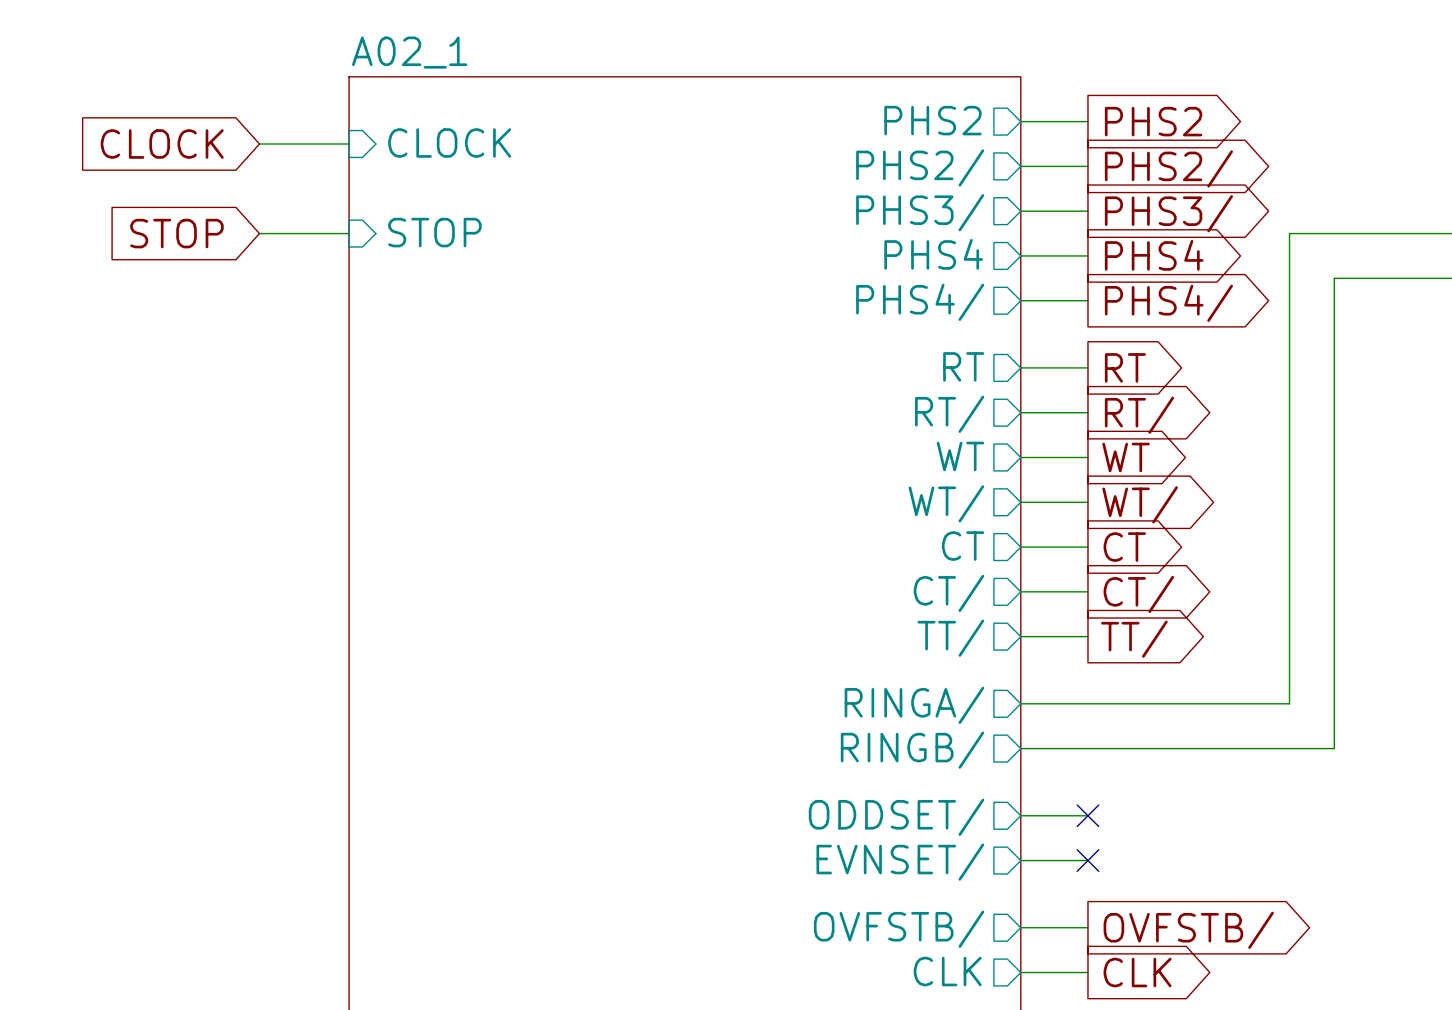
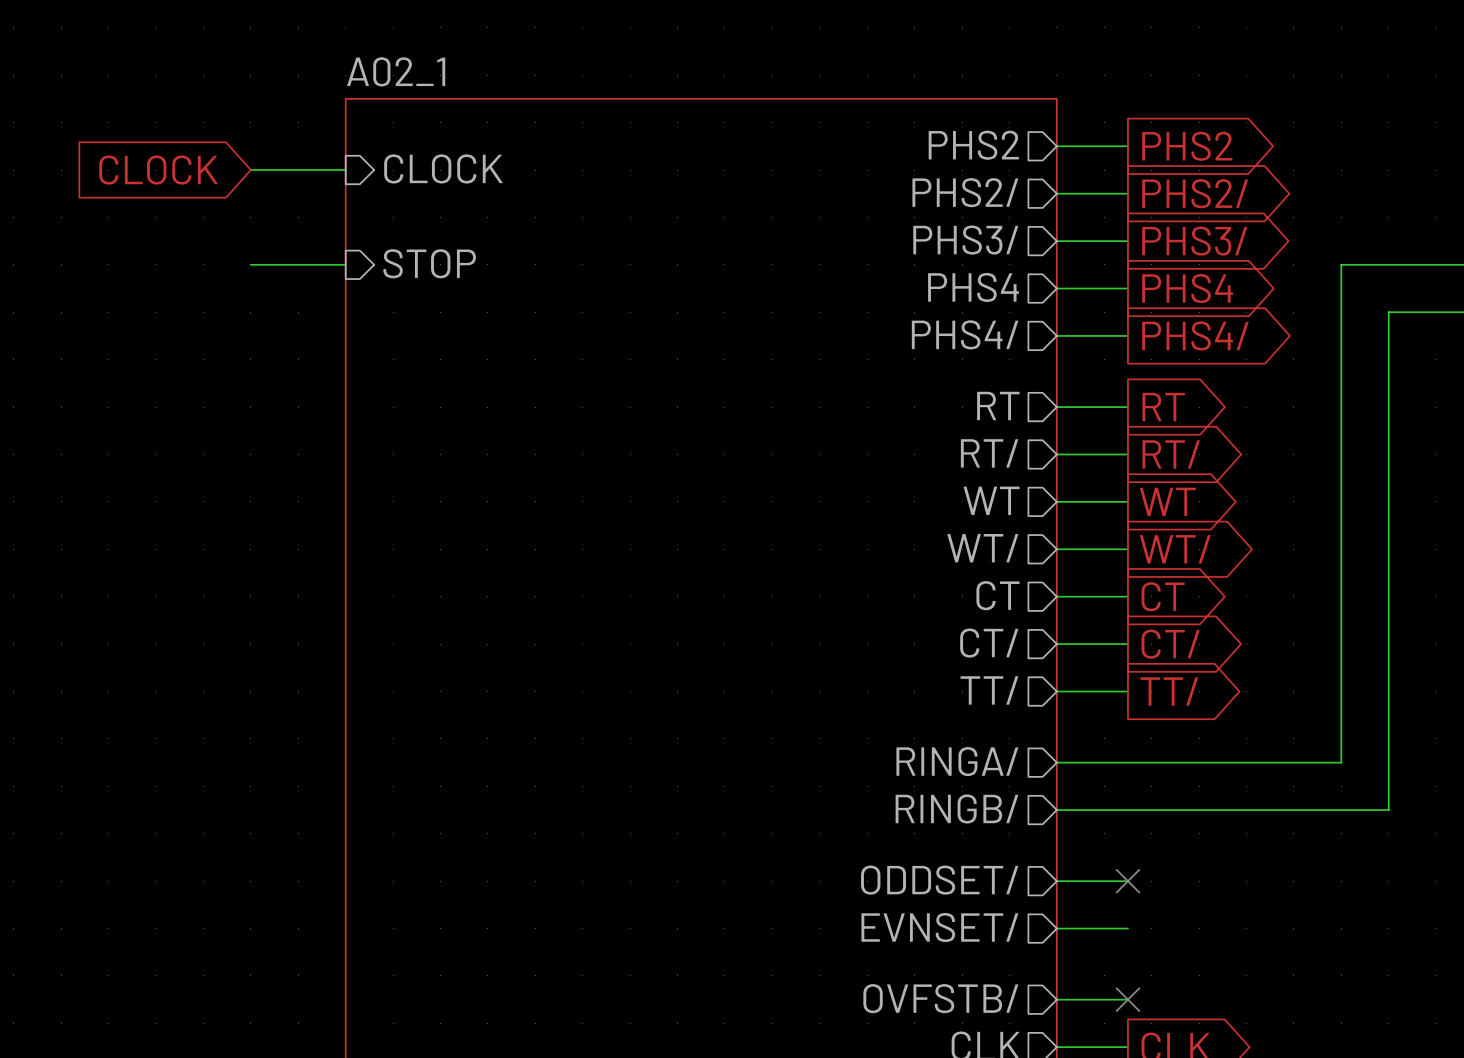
global label: STOP (176, 233) -> none
no-connect mark: (1087, 860) -> none
no-connect mark: none -> (1127, 999)
global label: OVFSTB/ (1188, 930) -> none

